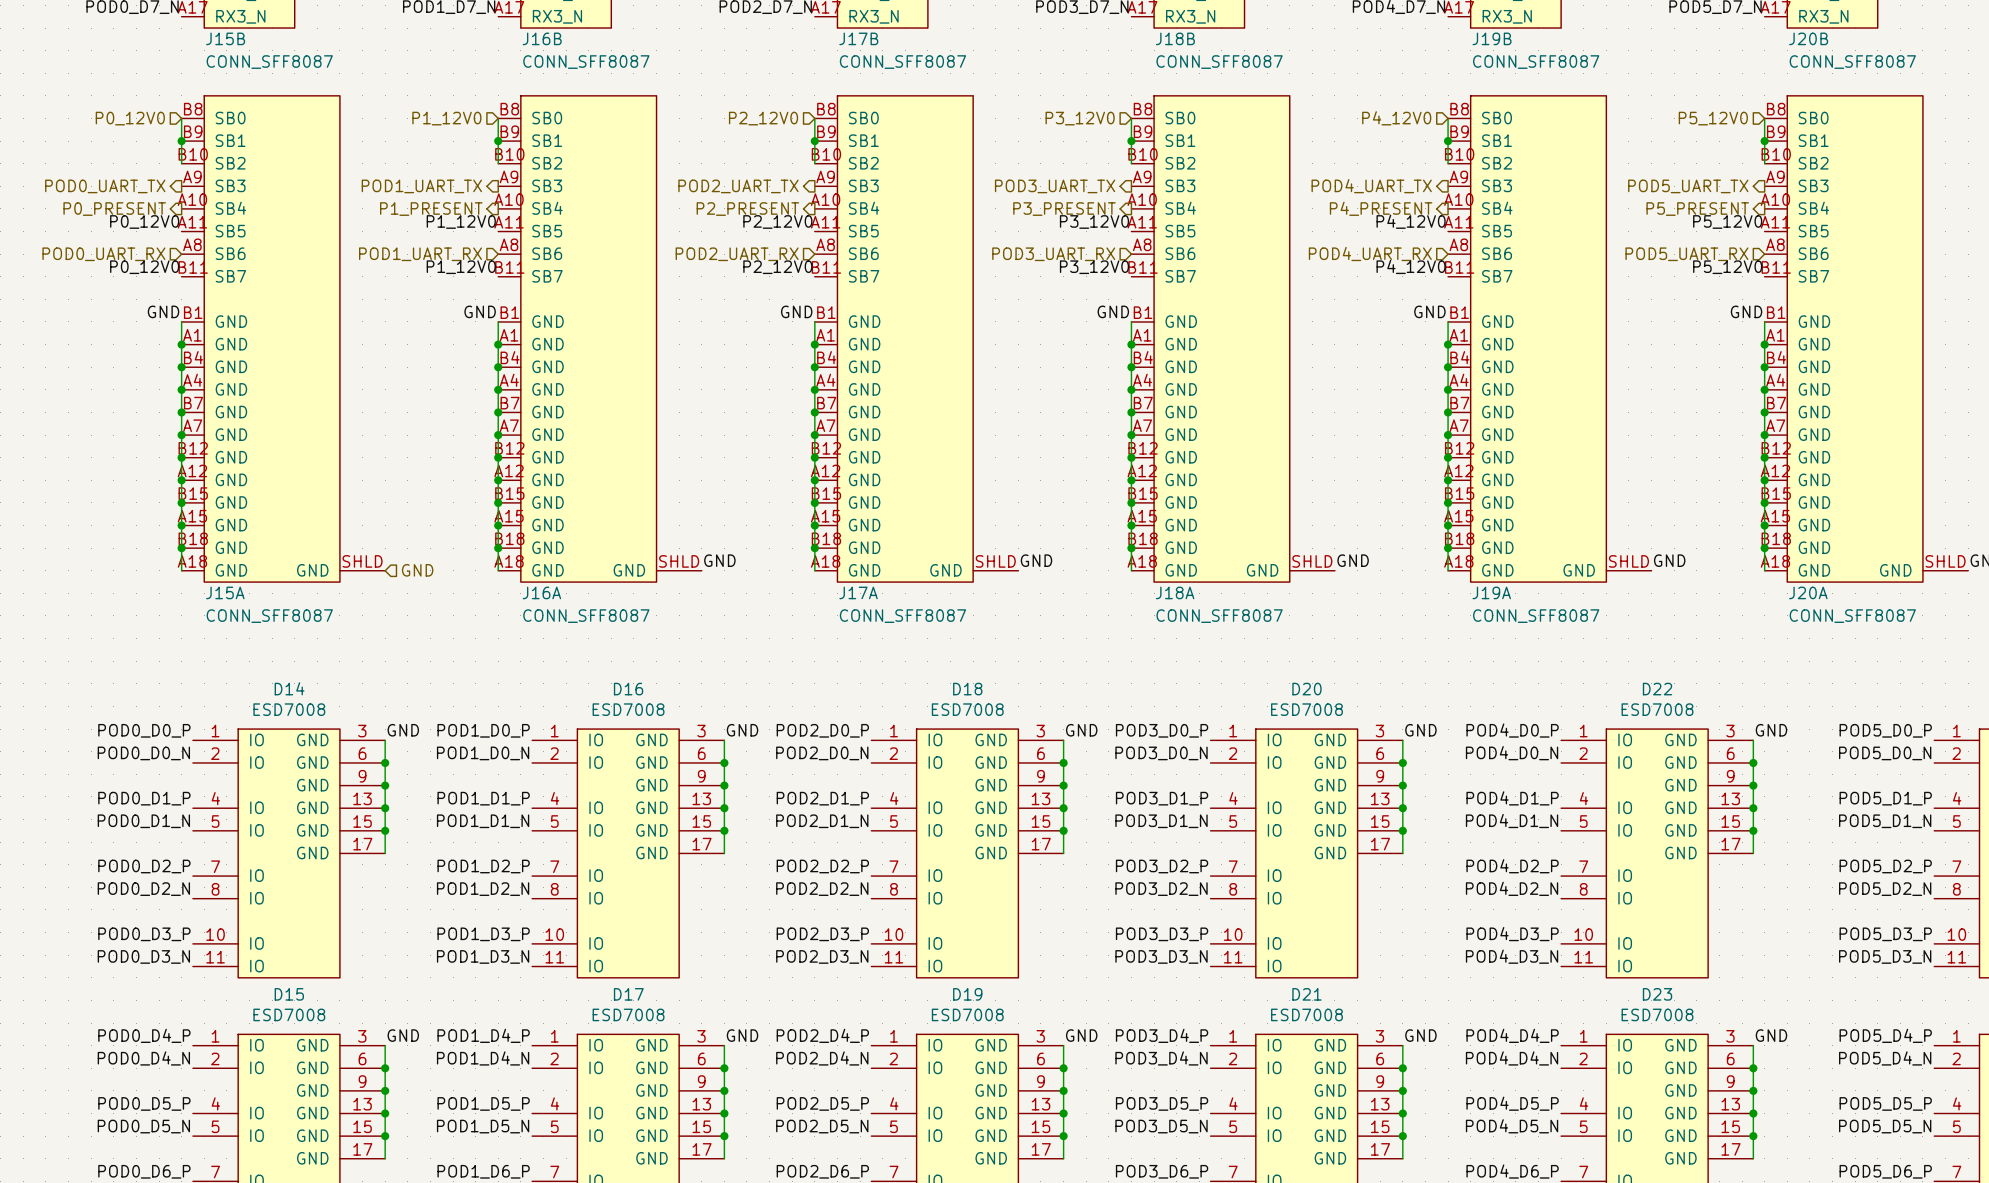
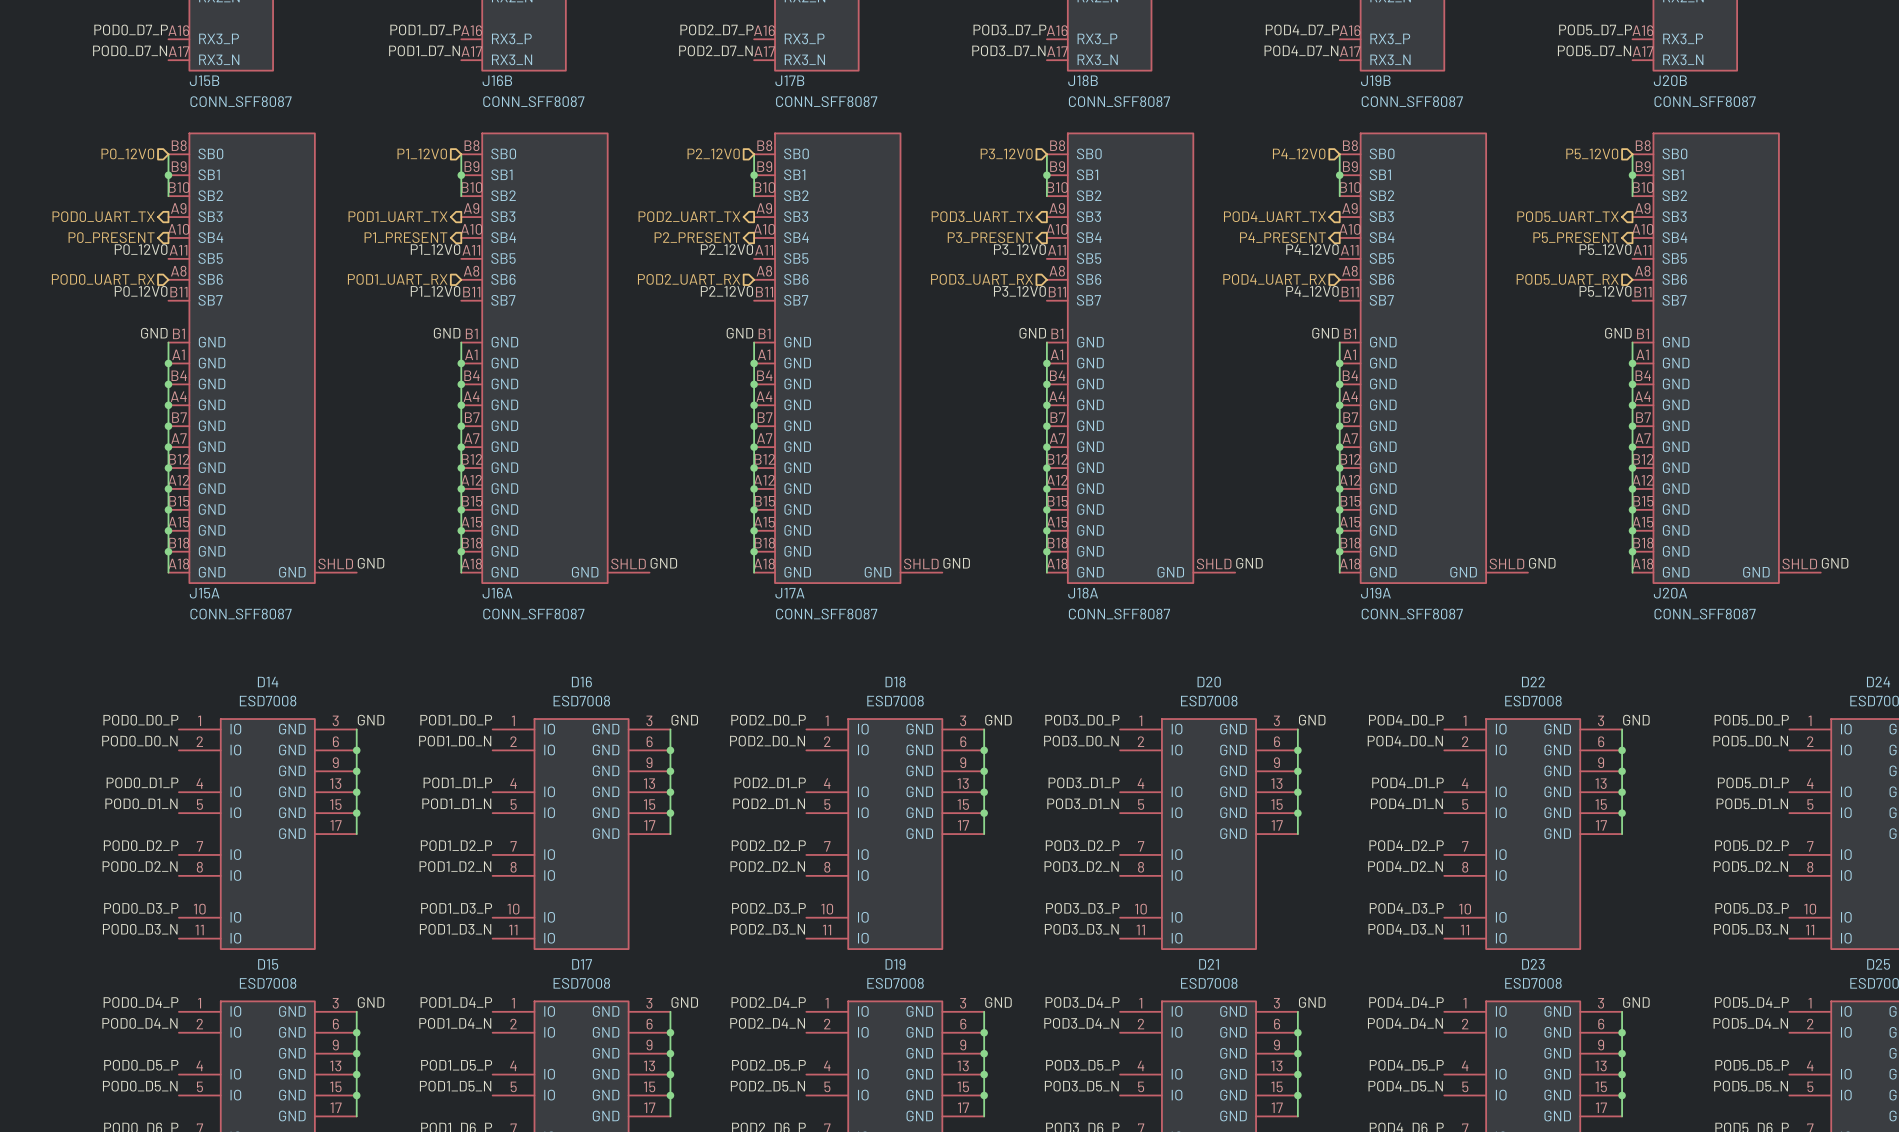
label: none -> GND (371, 563)
hierarchical label: GND (417, 570) -> none

